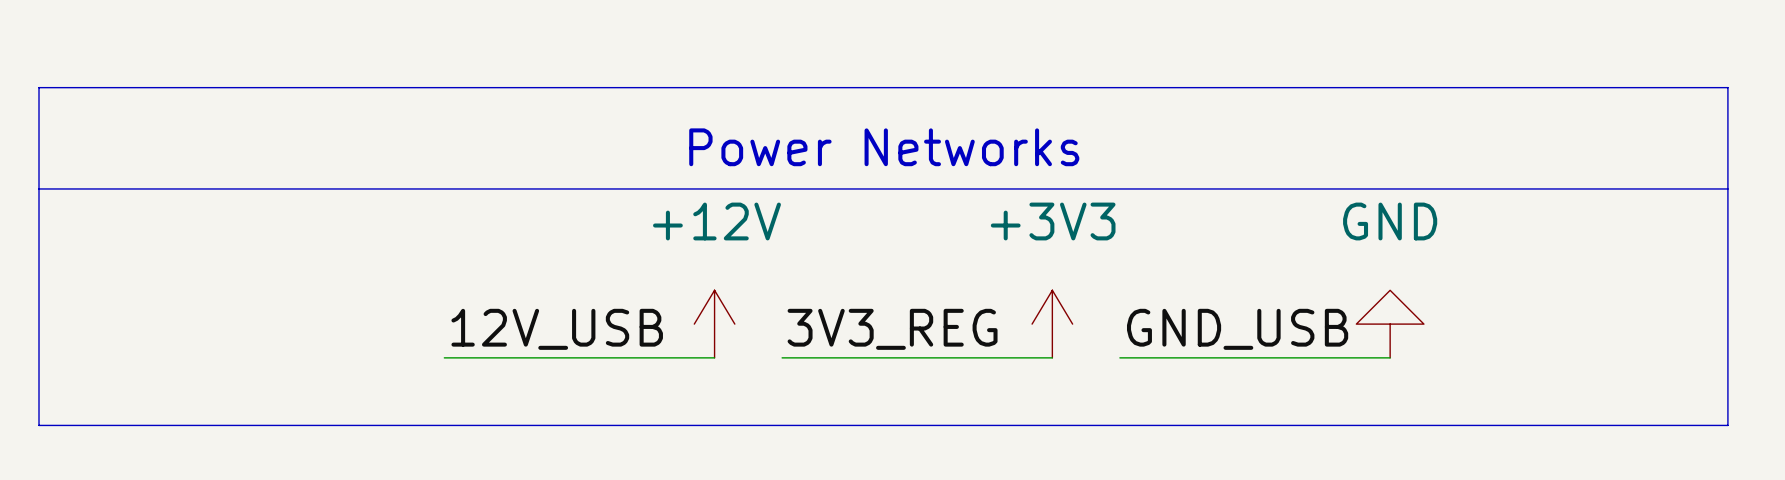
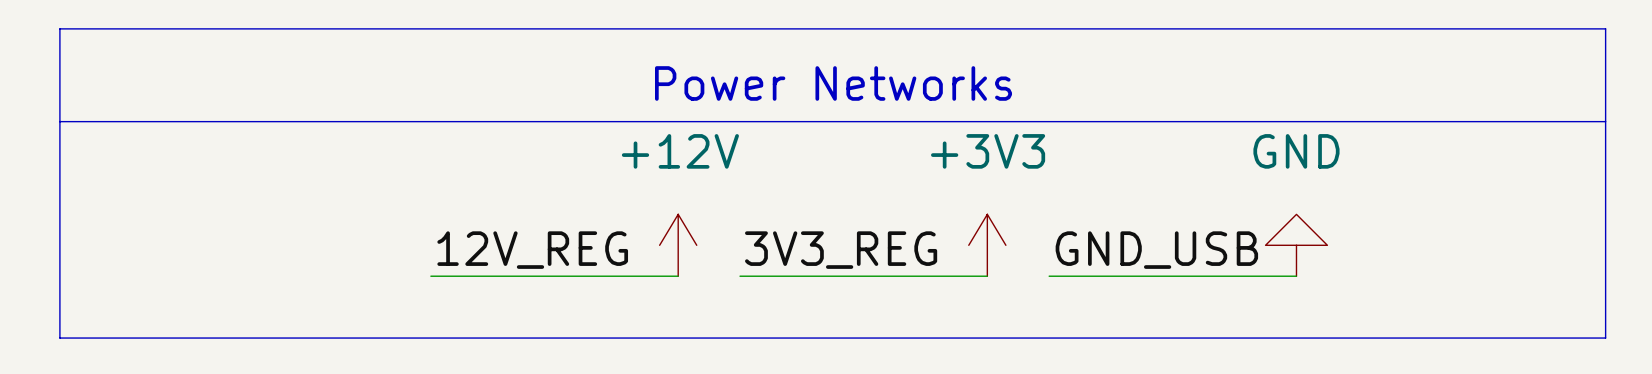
label: 12V_USB (557, 329) -> 12V_REG (532, 250)

